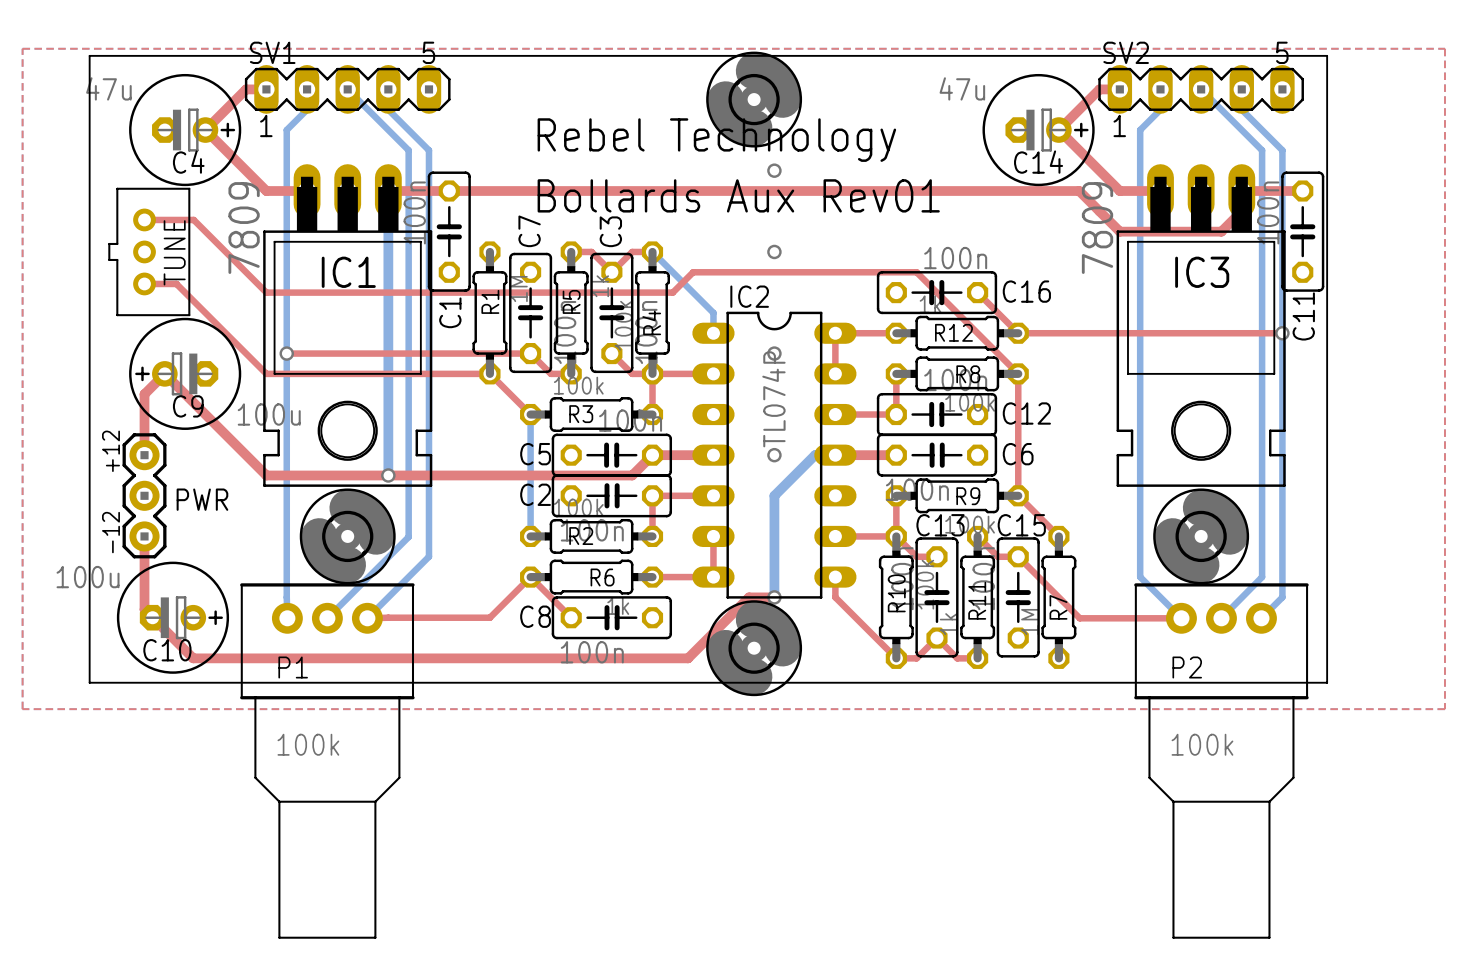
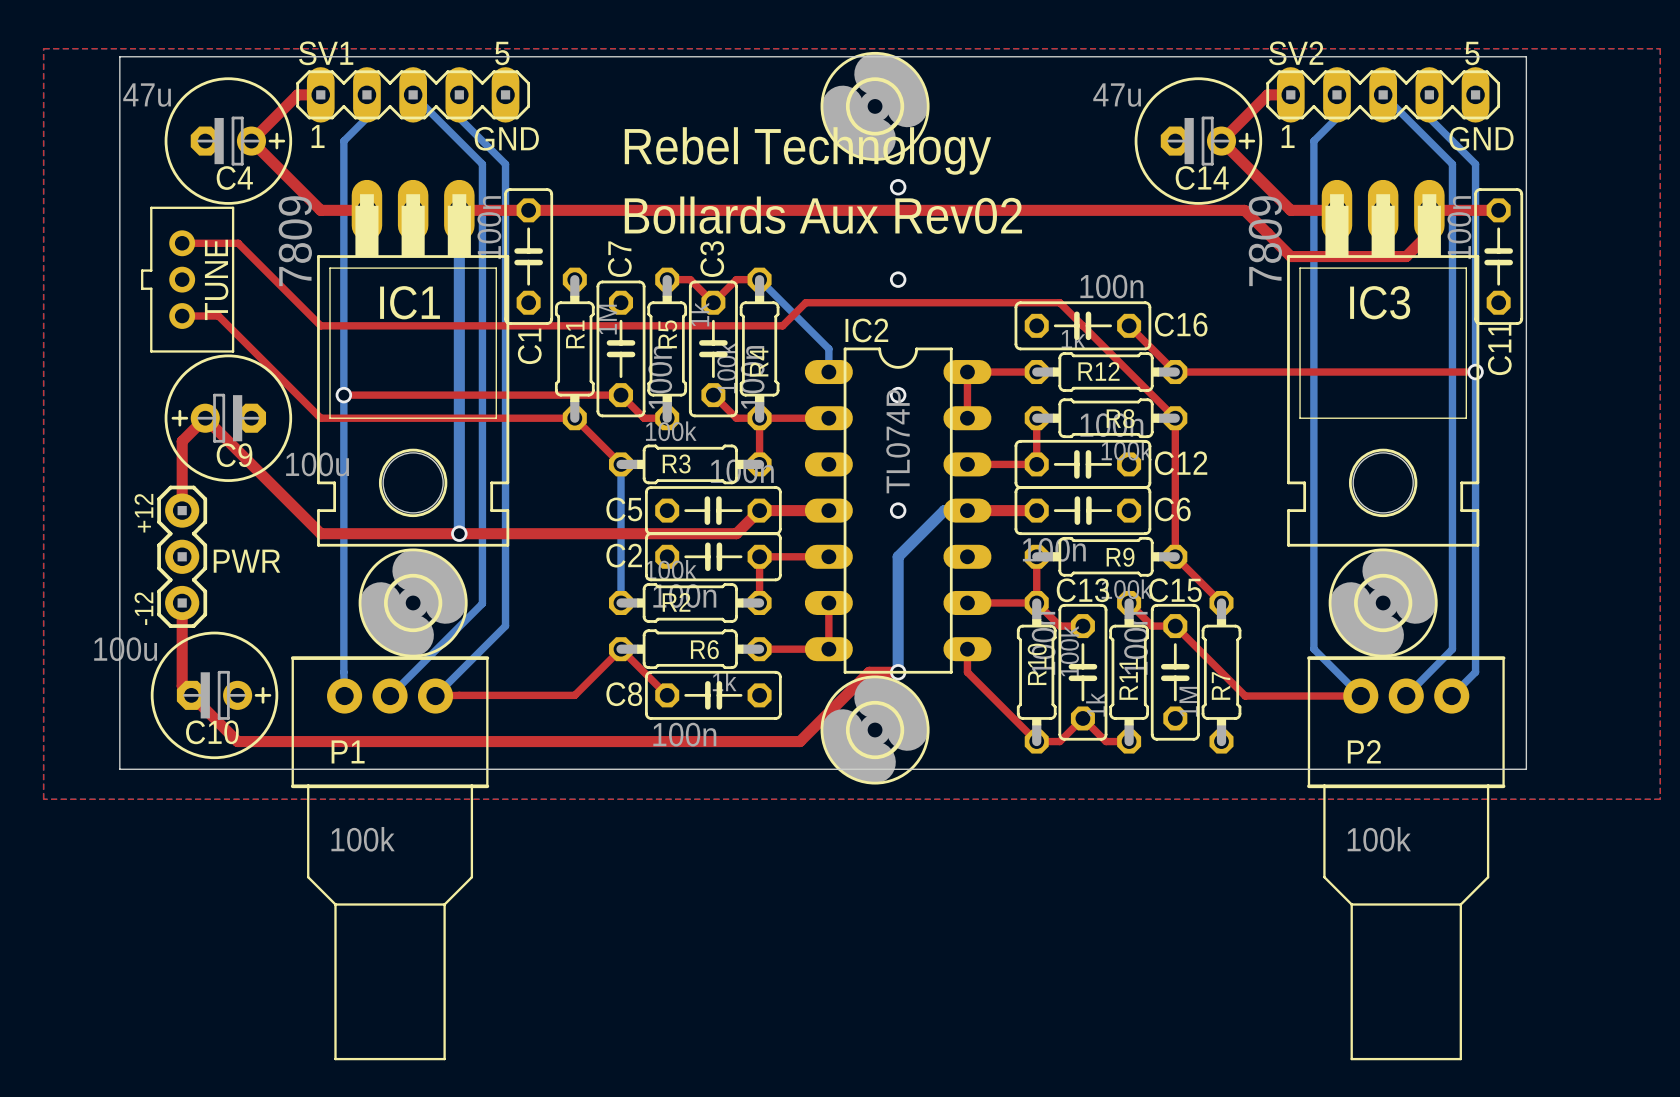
text: none -> GND (506, 138)
text: none -> GND (1481, 138)
text: Bollards Aux Rev01 (738, 195) -> Bollards Aux Rev02 (823, 215)

